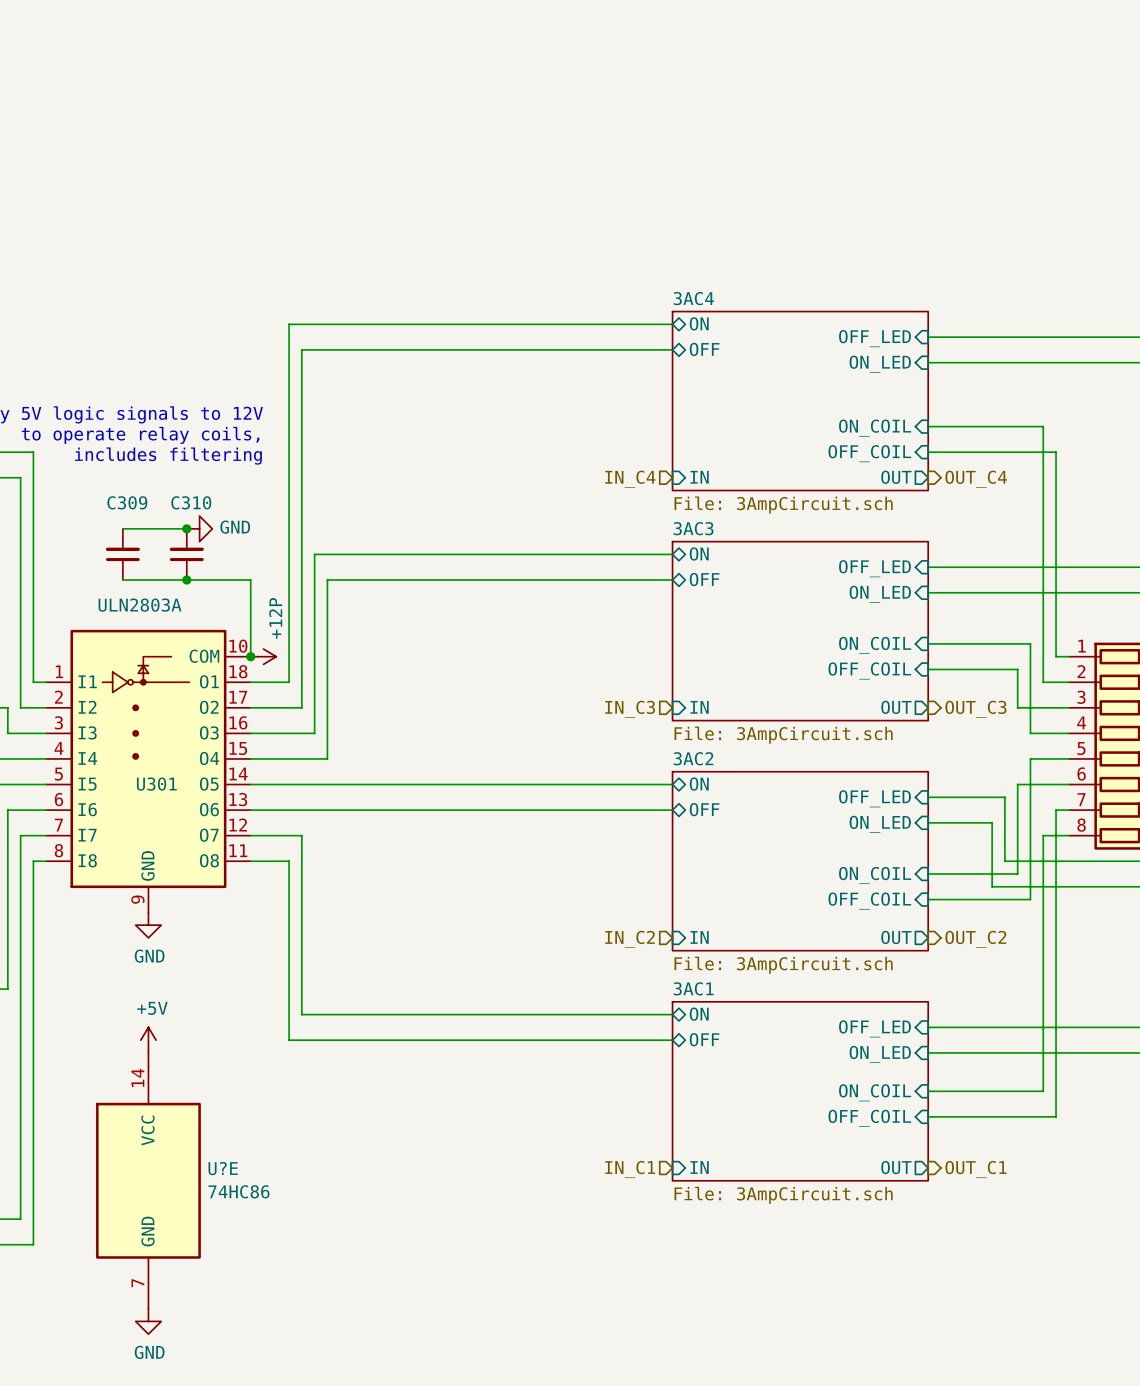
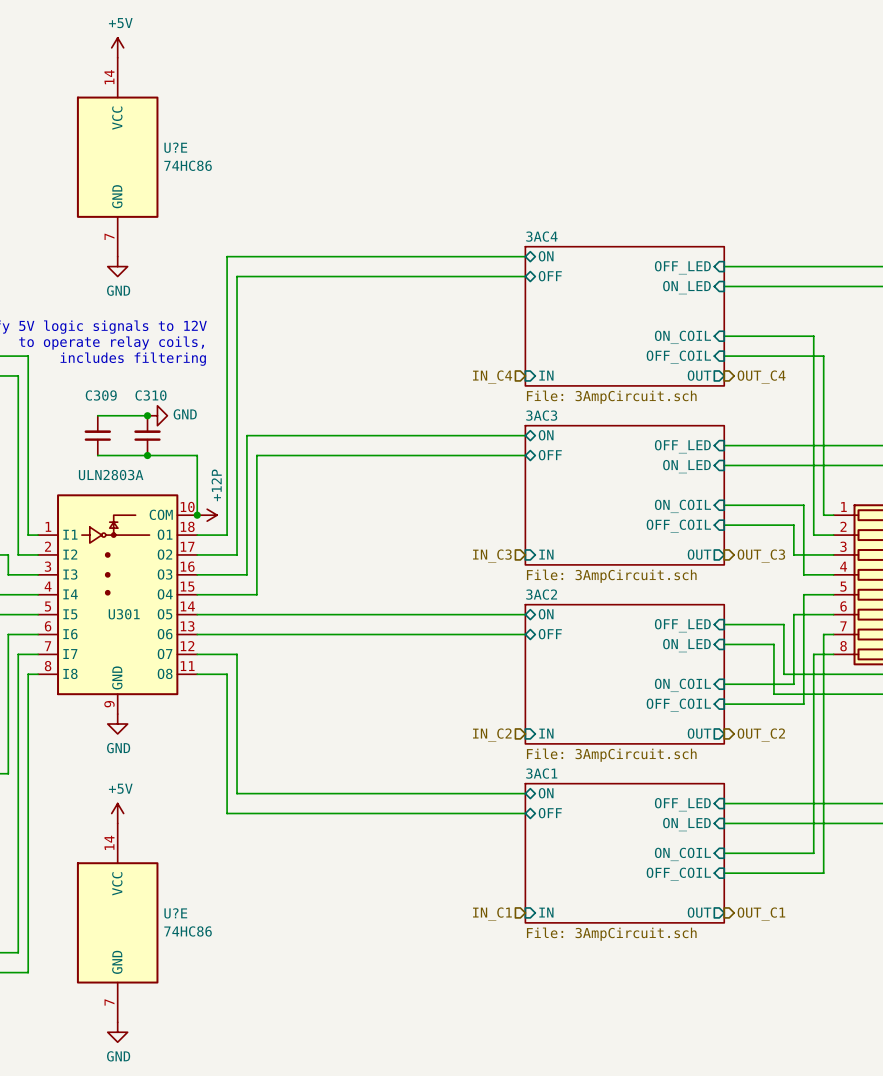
power symbol: none -> +5V (117, 47)
U?E: none -> 74HC86 (117, 157)
power symbol: none -> GND (117, 266)

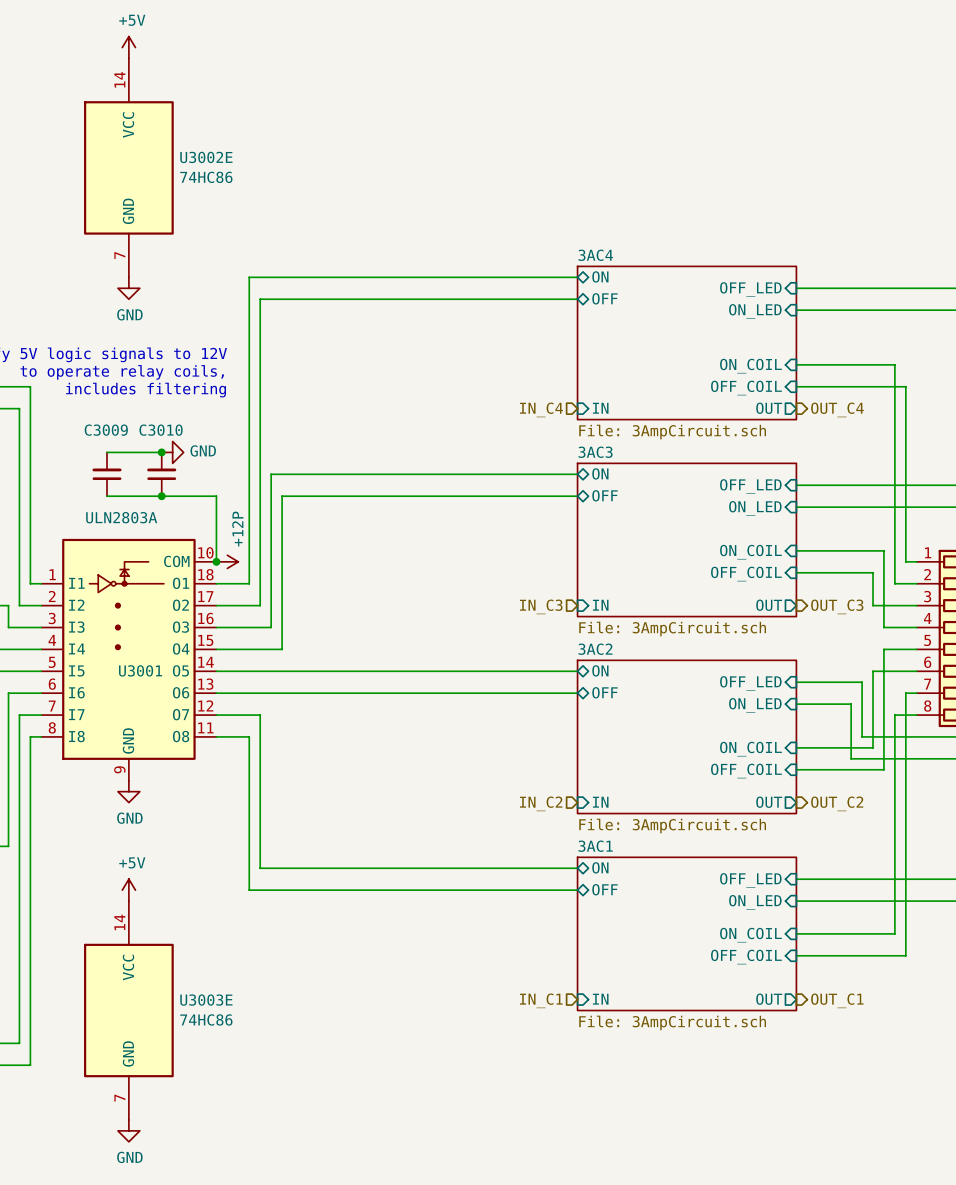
U?E name: U?E (175, 147) -> U3002E (206, 157)
C309 name: C309 (101, 395) -> C3009 (106, 430)
C310 name: C310 (151, 395) -> C3010 (161, 430)
U301 name: U301 (124, 614) -> U3001 (140, 670)
U?E name: U?E (175, 913) -> U3003E (206, 1000)

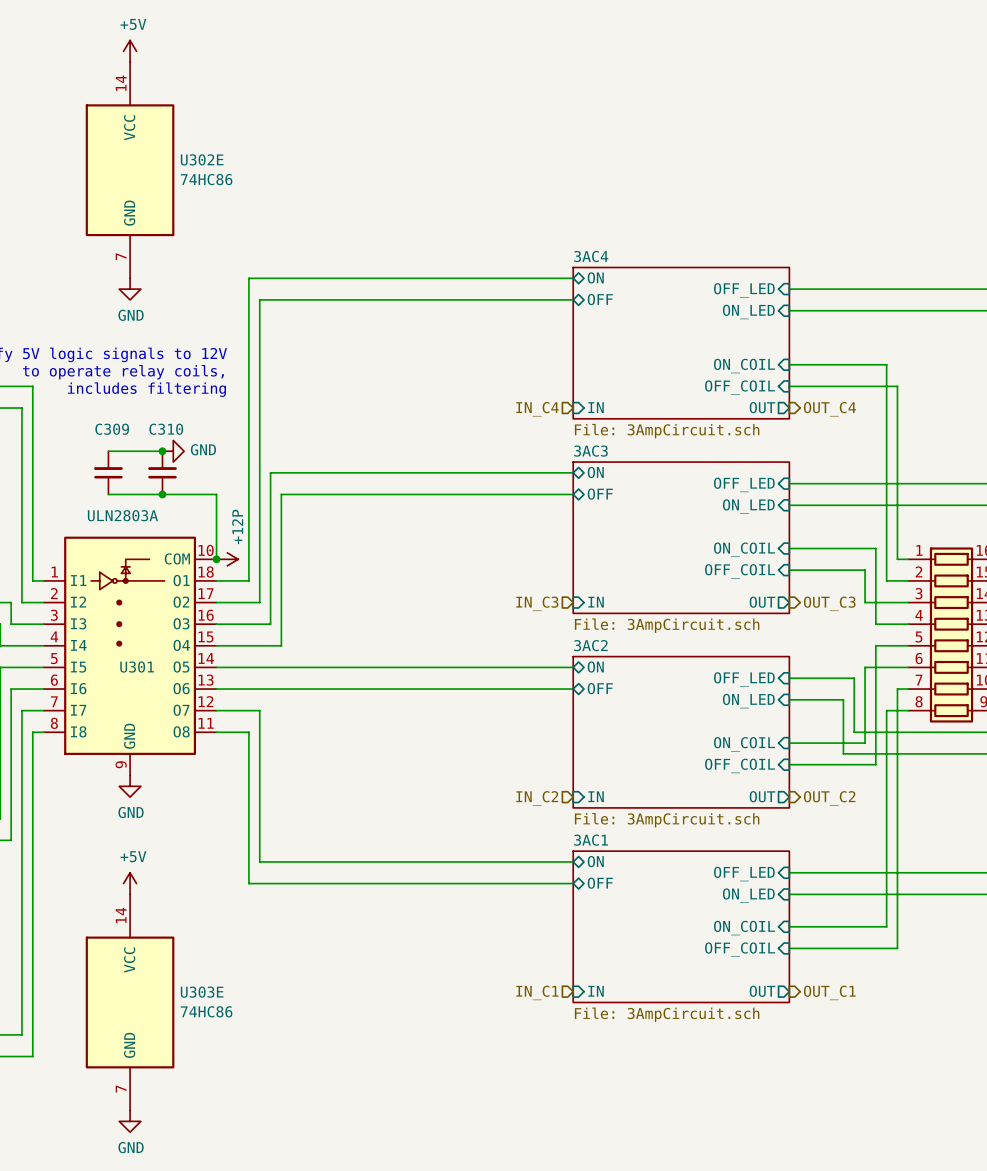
U3002E name: U3002E (206, 157) -> U302E (202, 159)
C3009 name: C3009 (106, 430) -> C309 (112, 429)
C3010 name: C3010 (161, 430) -> C310 (166, 429)
U3001 name: U3001 (140, 670) -> U301 (137, 667)
U3003E name: U3003E (206, 1000) -> U303E (202, 992)

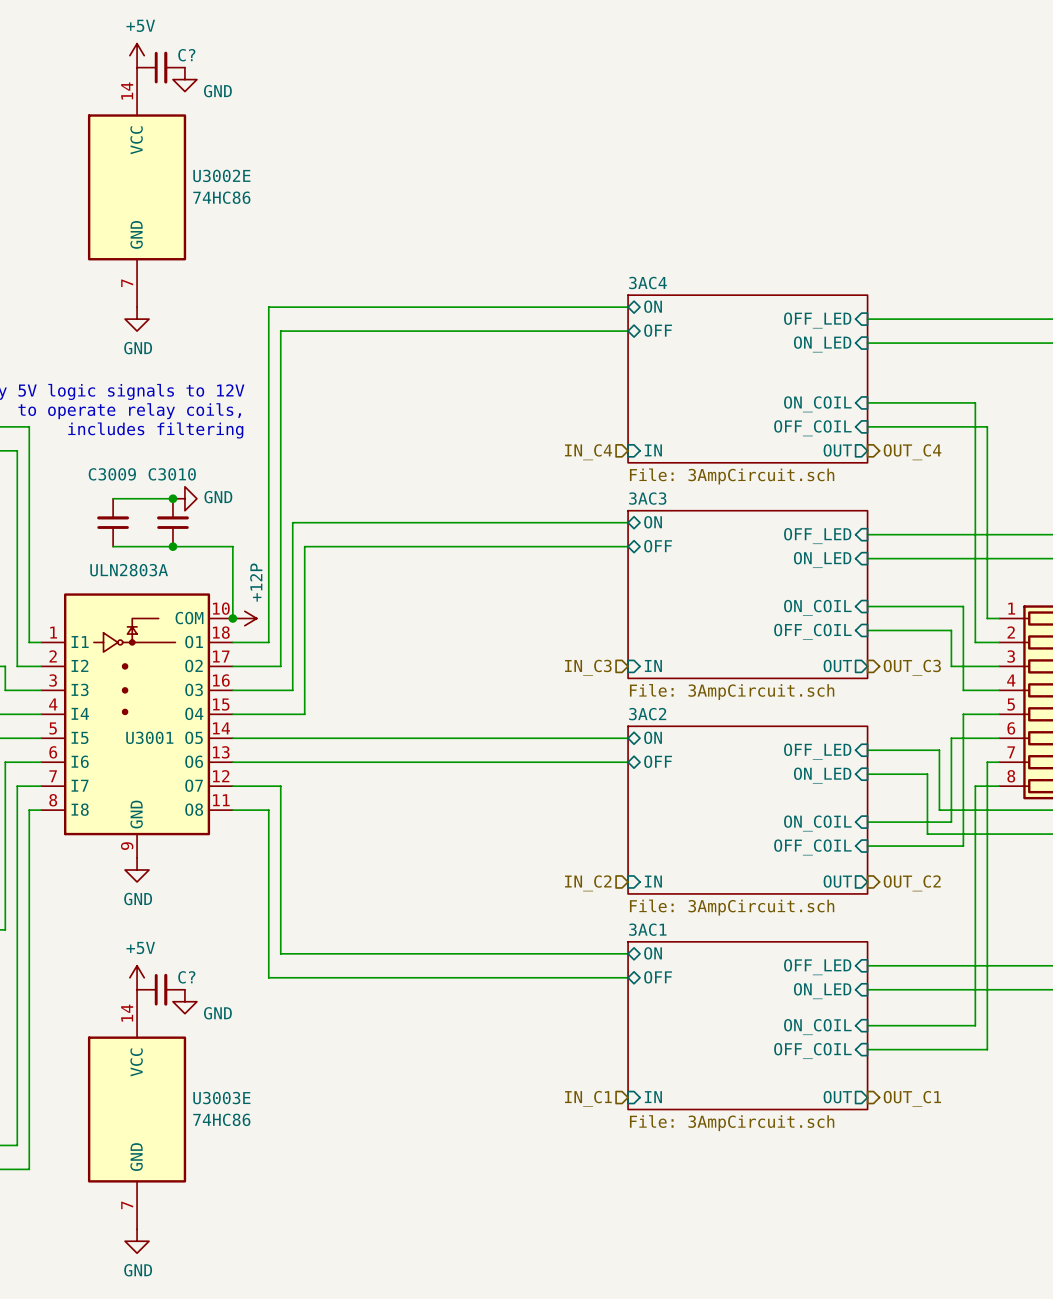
C?: none -> (161, 67)
power symbol: none -> GND (184, 79)
U302E name: U302E (202, 159) -> U3002E (221, 175)
C309 name: C309 (112, 429) -> C3009 (112, 474)
C310 name: C310 (166, 429) -> C3010 (172, 474)
U301 name: U301 (137, 667) -> U3001 (149, 737)
C?: none -> (161, 989)
power symbol: none -> GND (184, 1001)
U303E name: U303E (202, 992) -> U3003E (221, 1098)

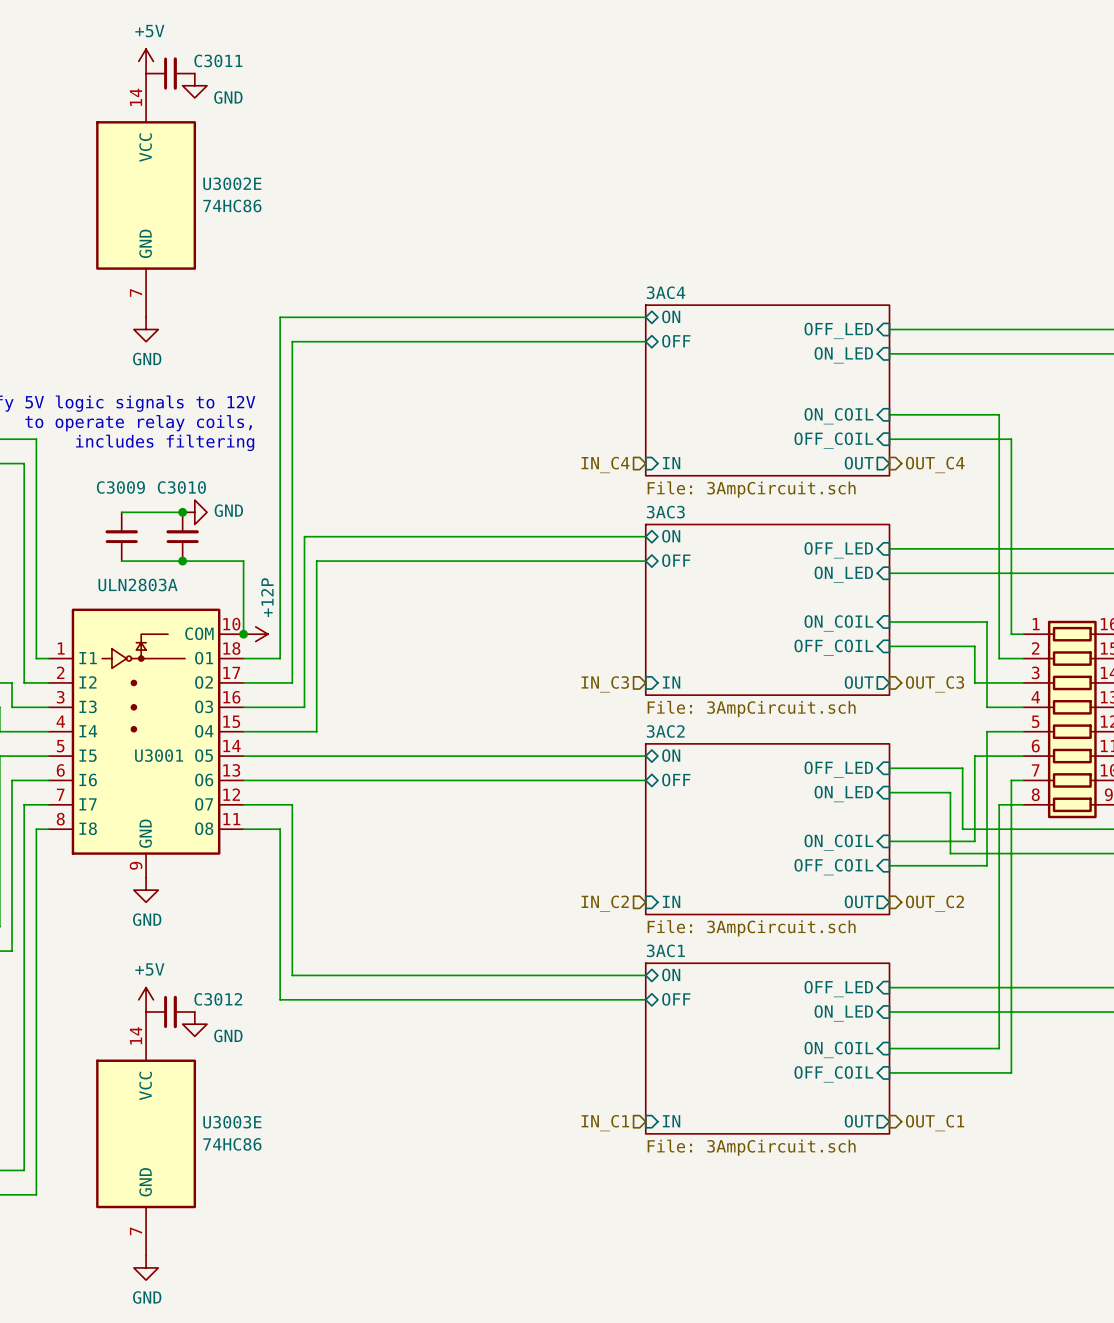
C? name: C? (186, 55) -> C3011 (218, 60)
C? name: C? (186, 977) -> C3012 (218, 999)

